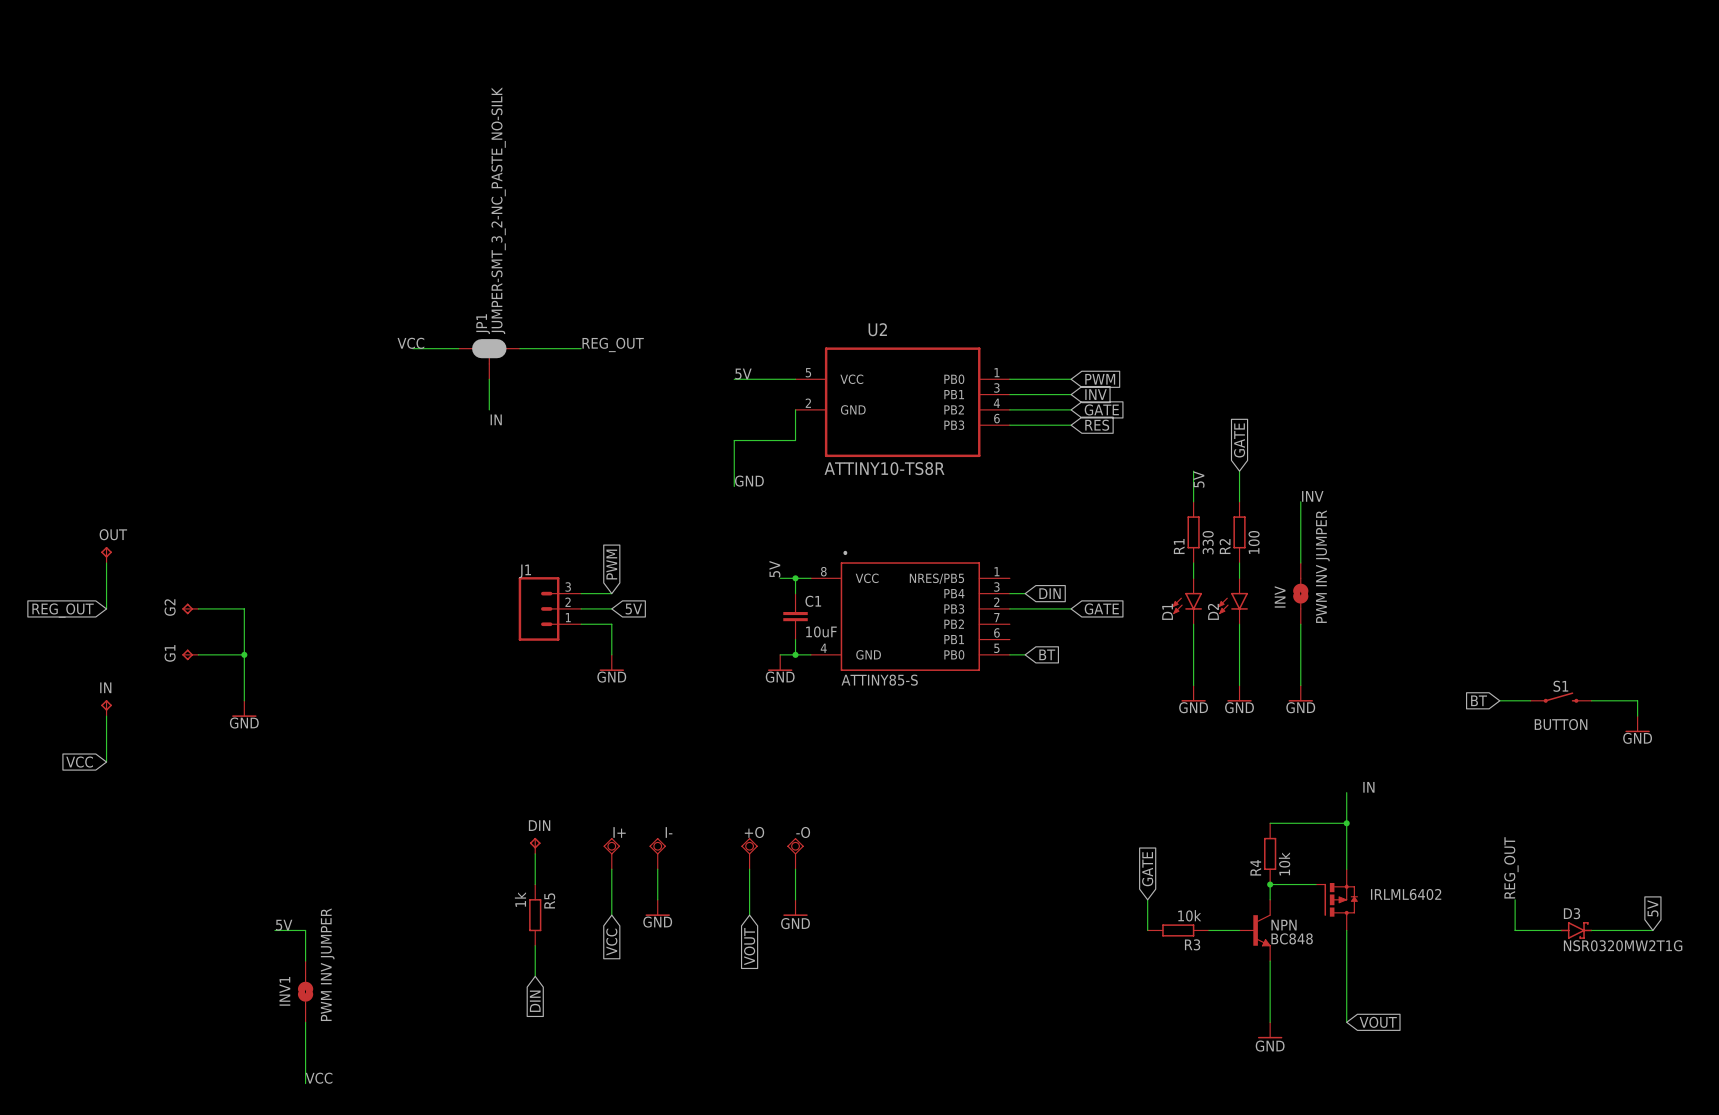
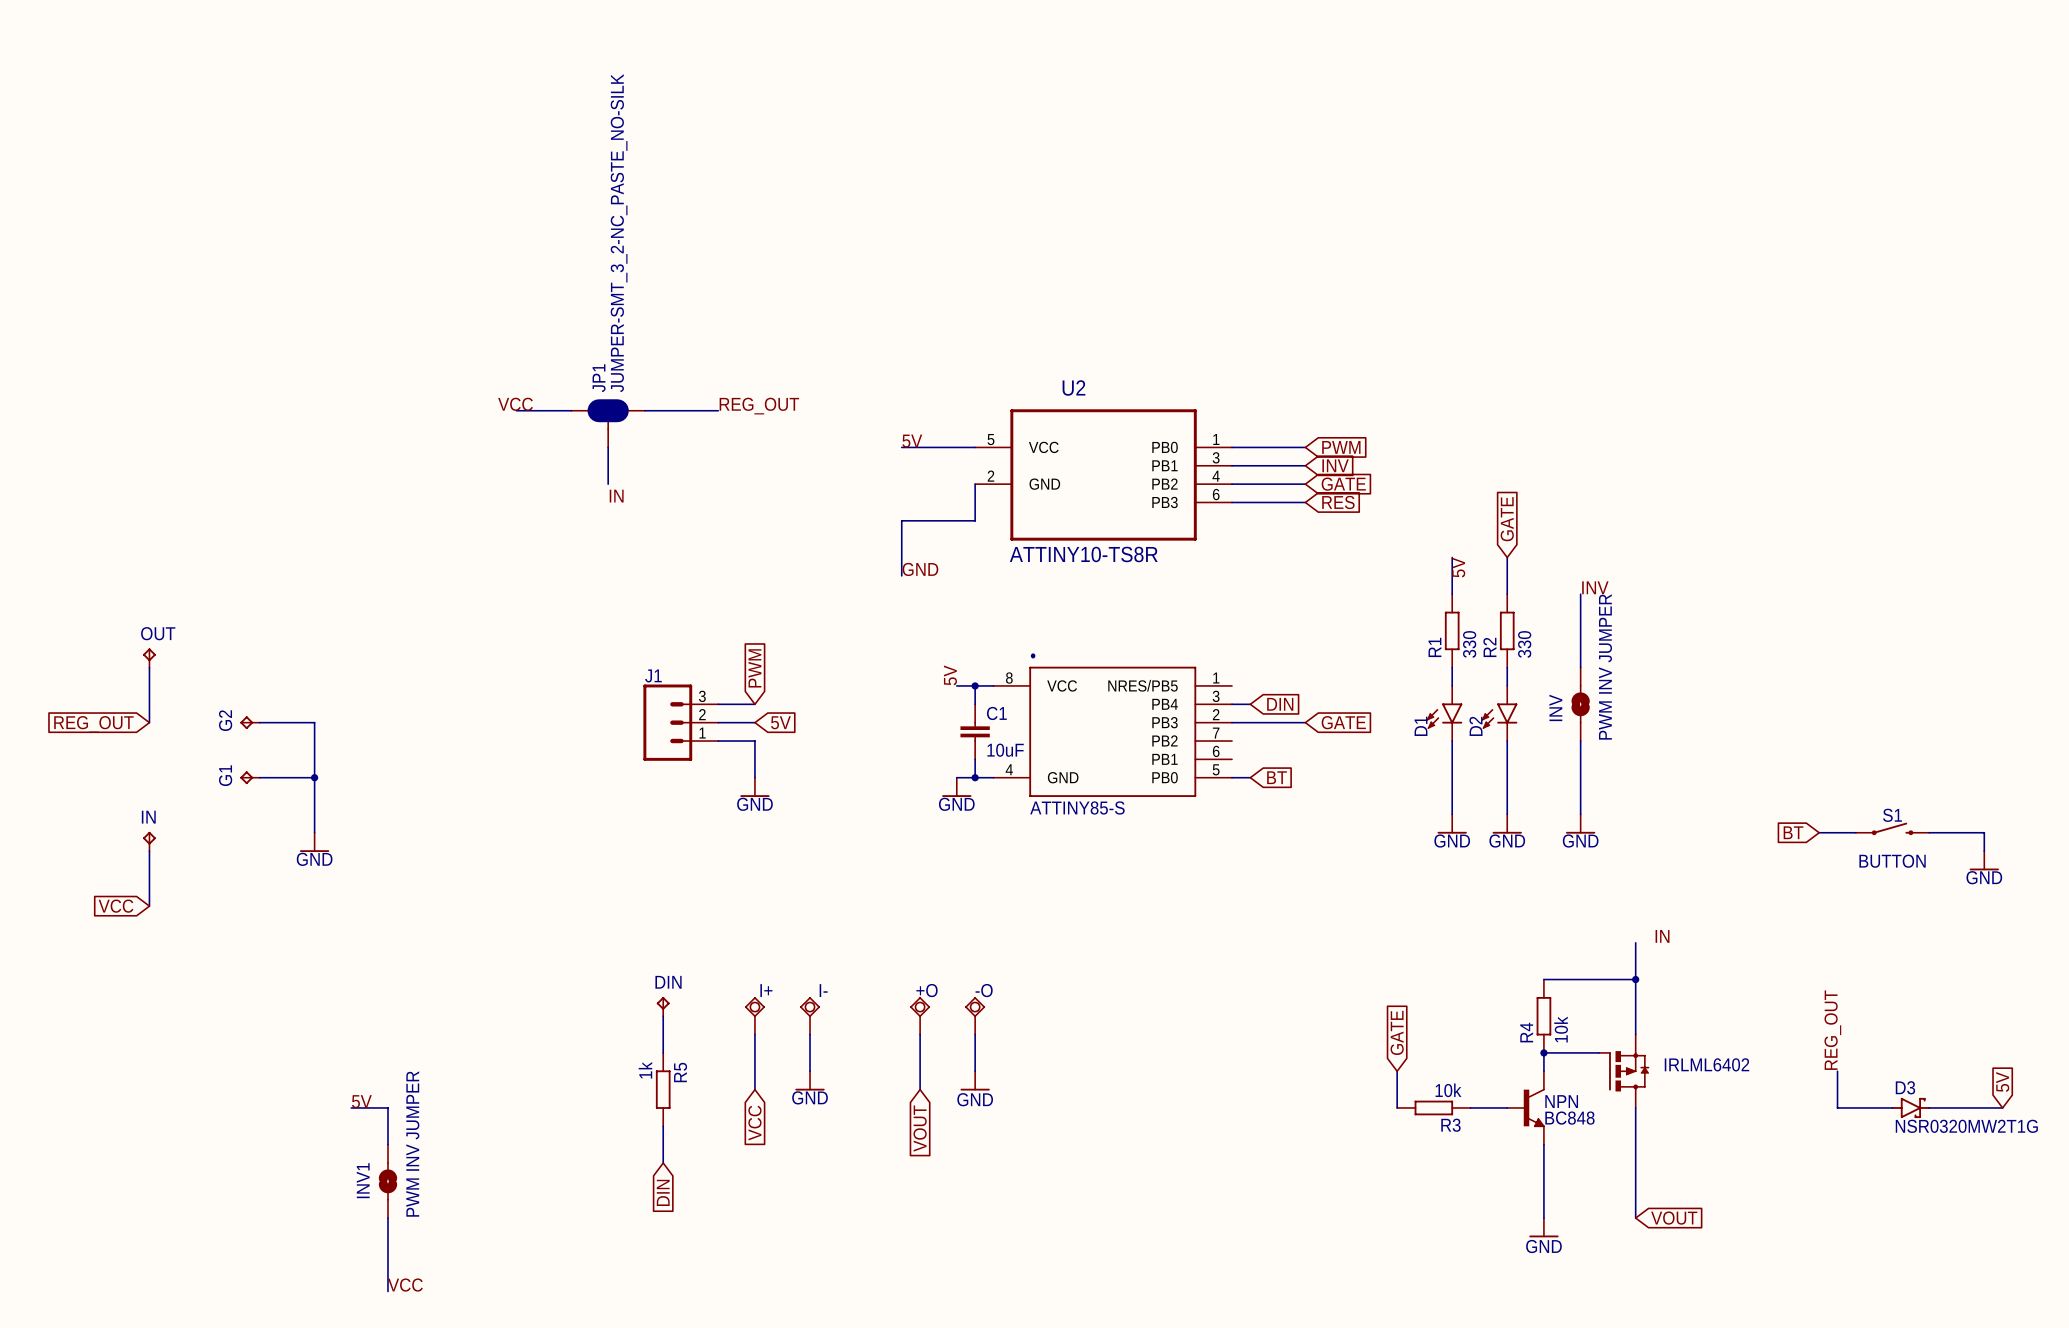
R2 value: 100 (1254, 542) -> 330 (1524, 644)

